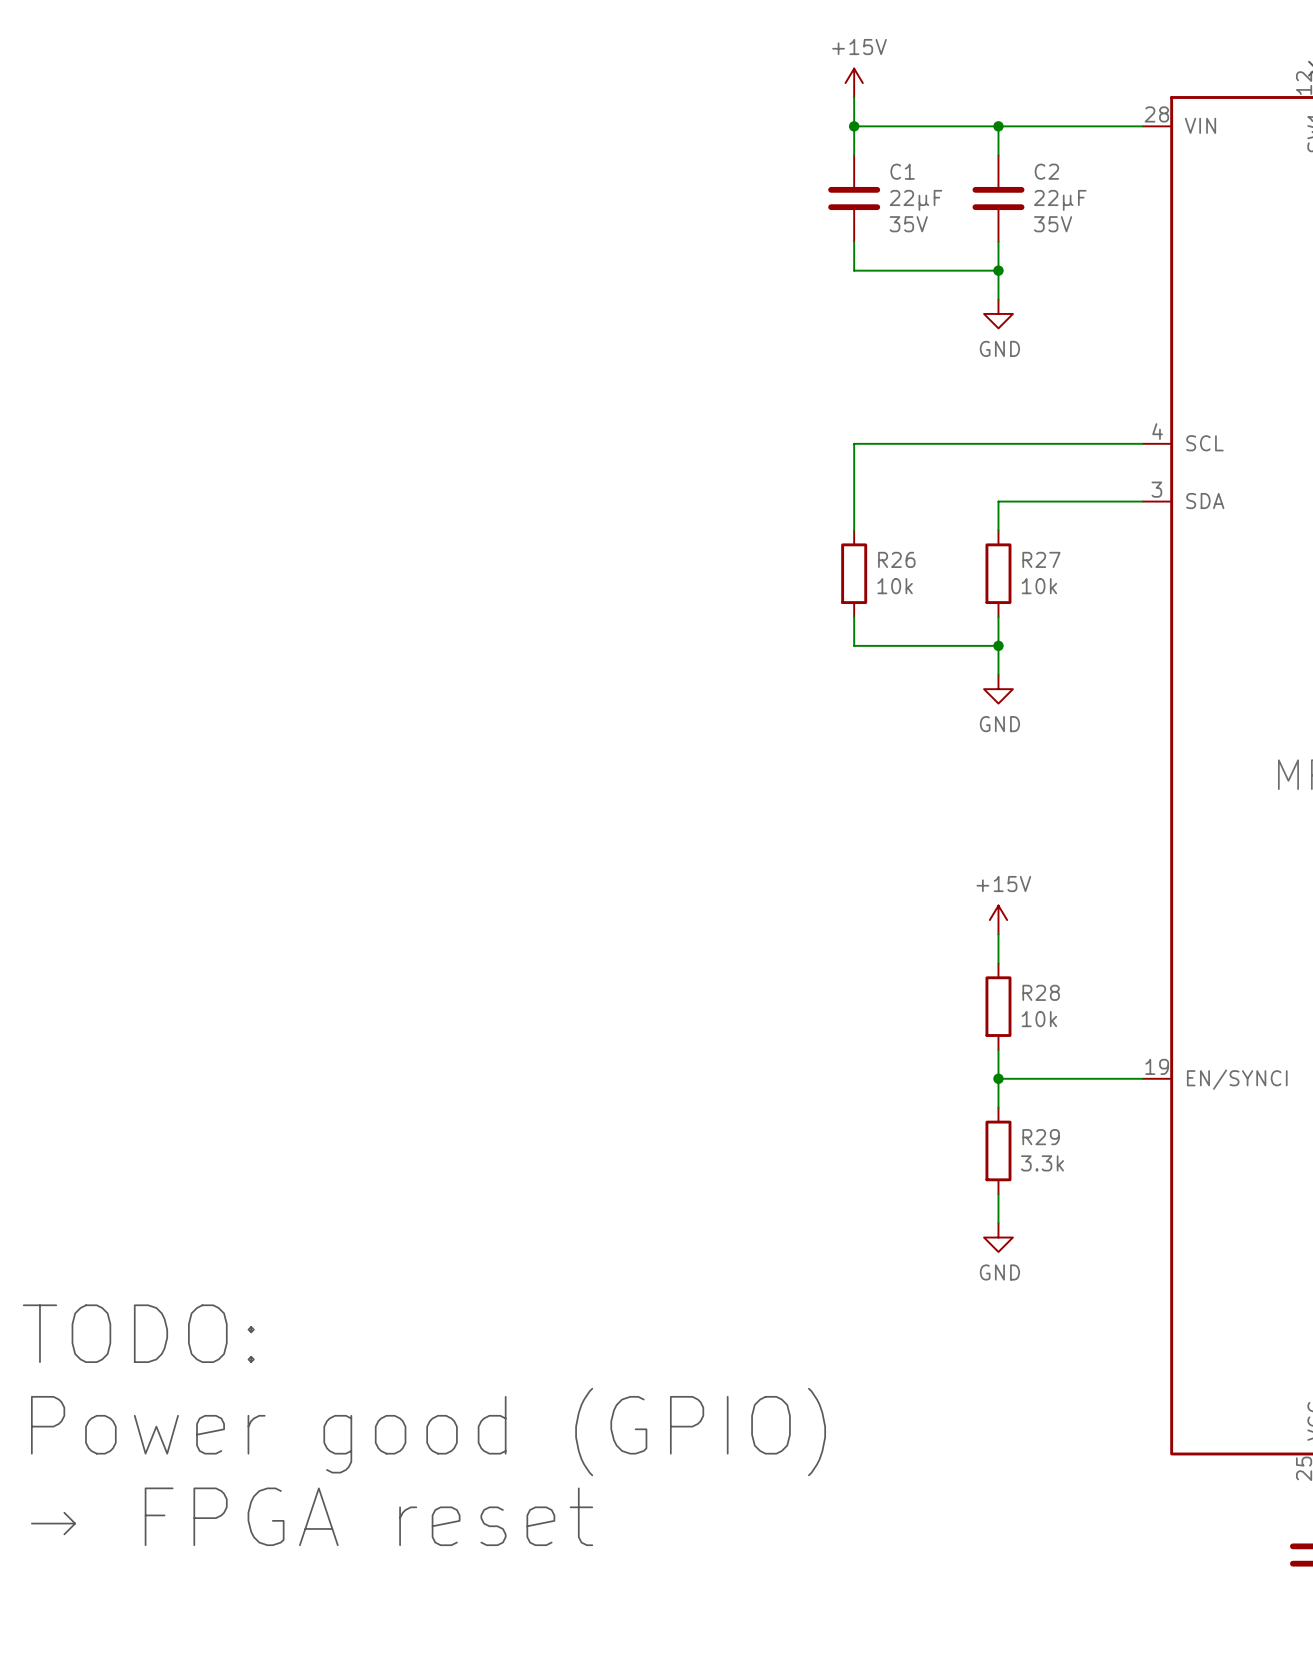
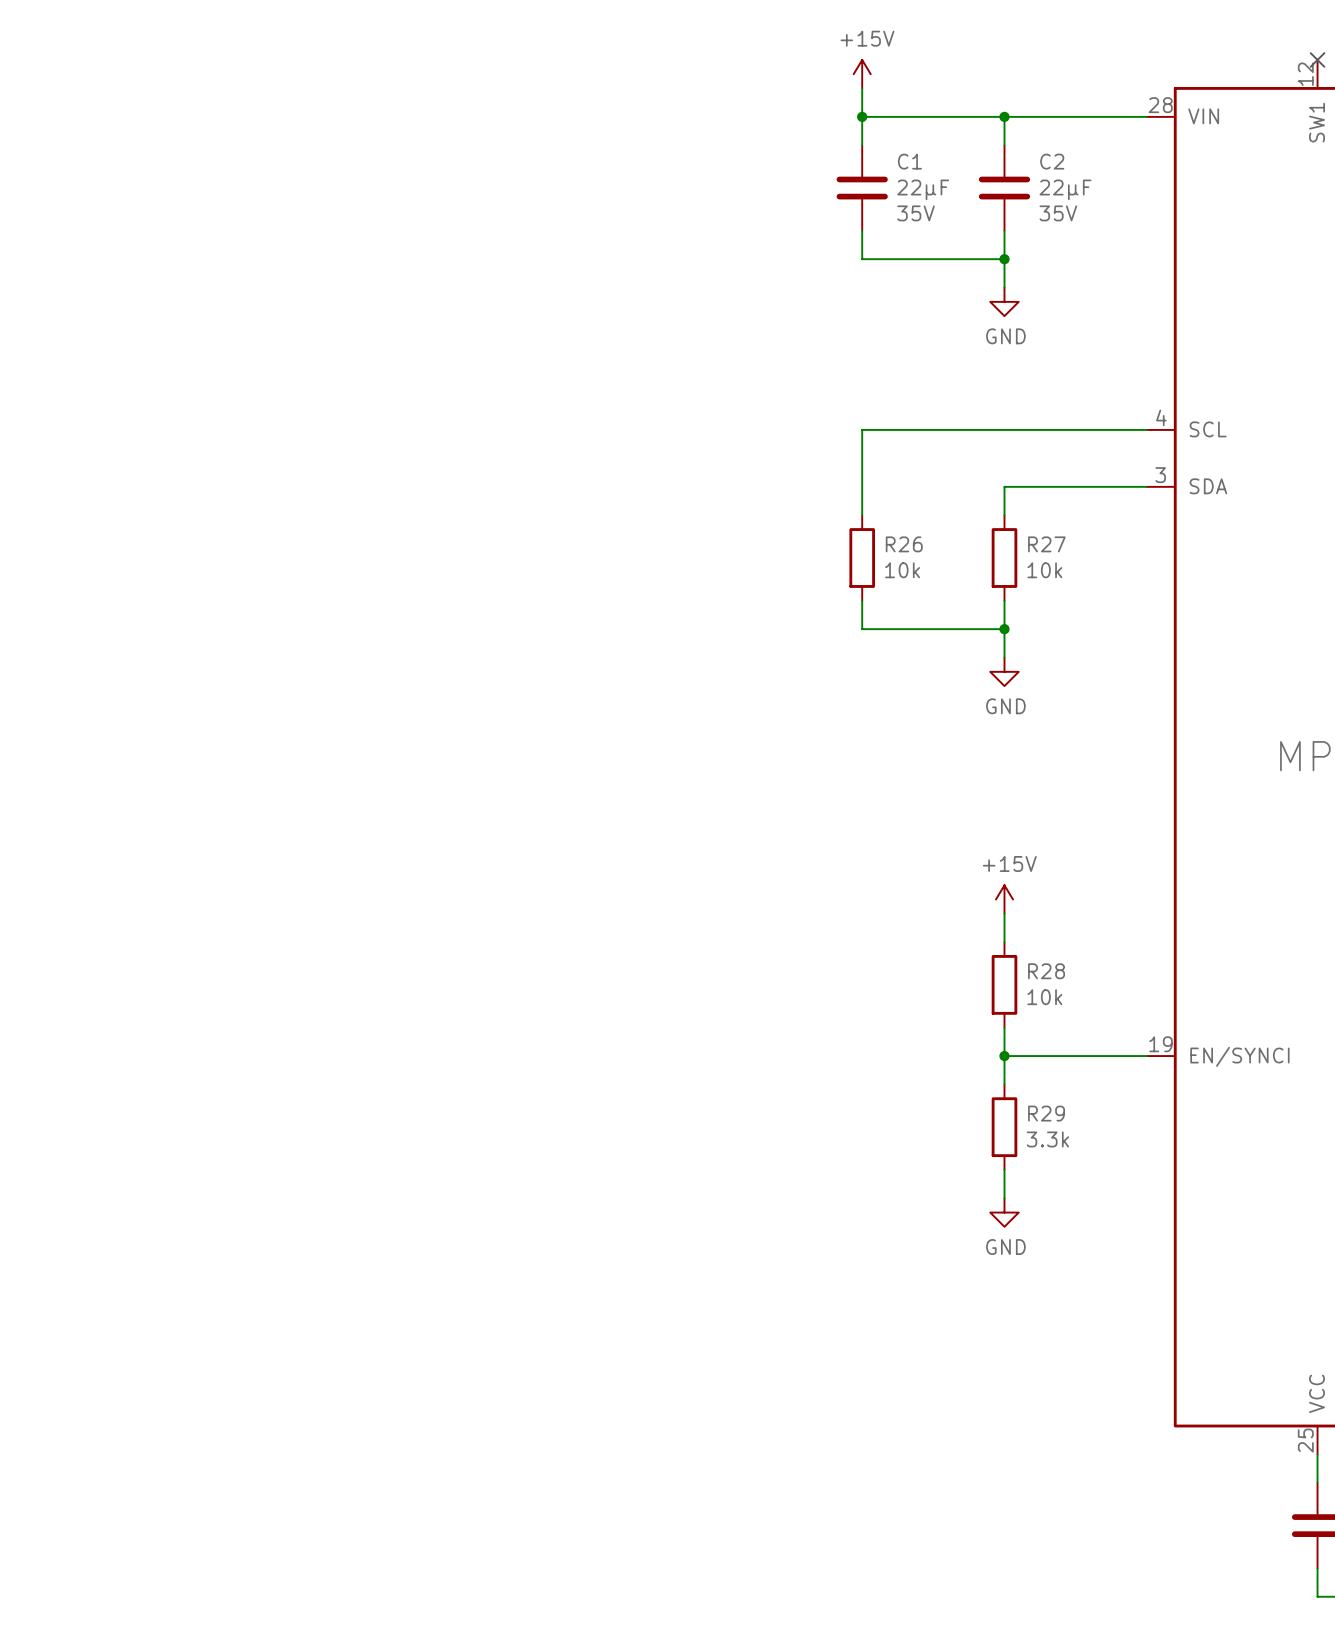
text: TODO: (138, 1333) -> none
text: Power good (GPIO) (428, 1432) -> none
text: → FPGA reset (312, 1516) -> none

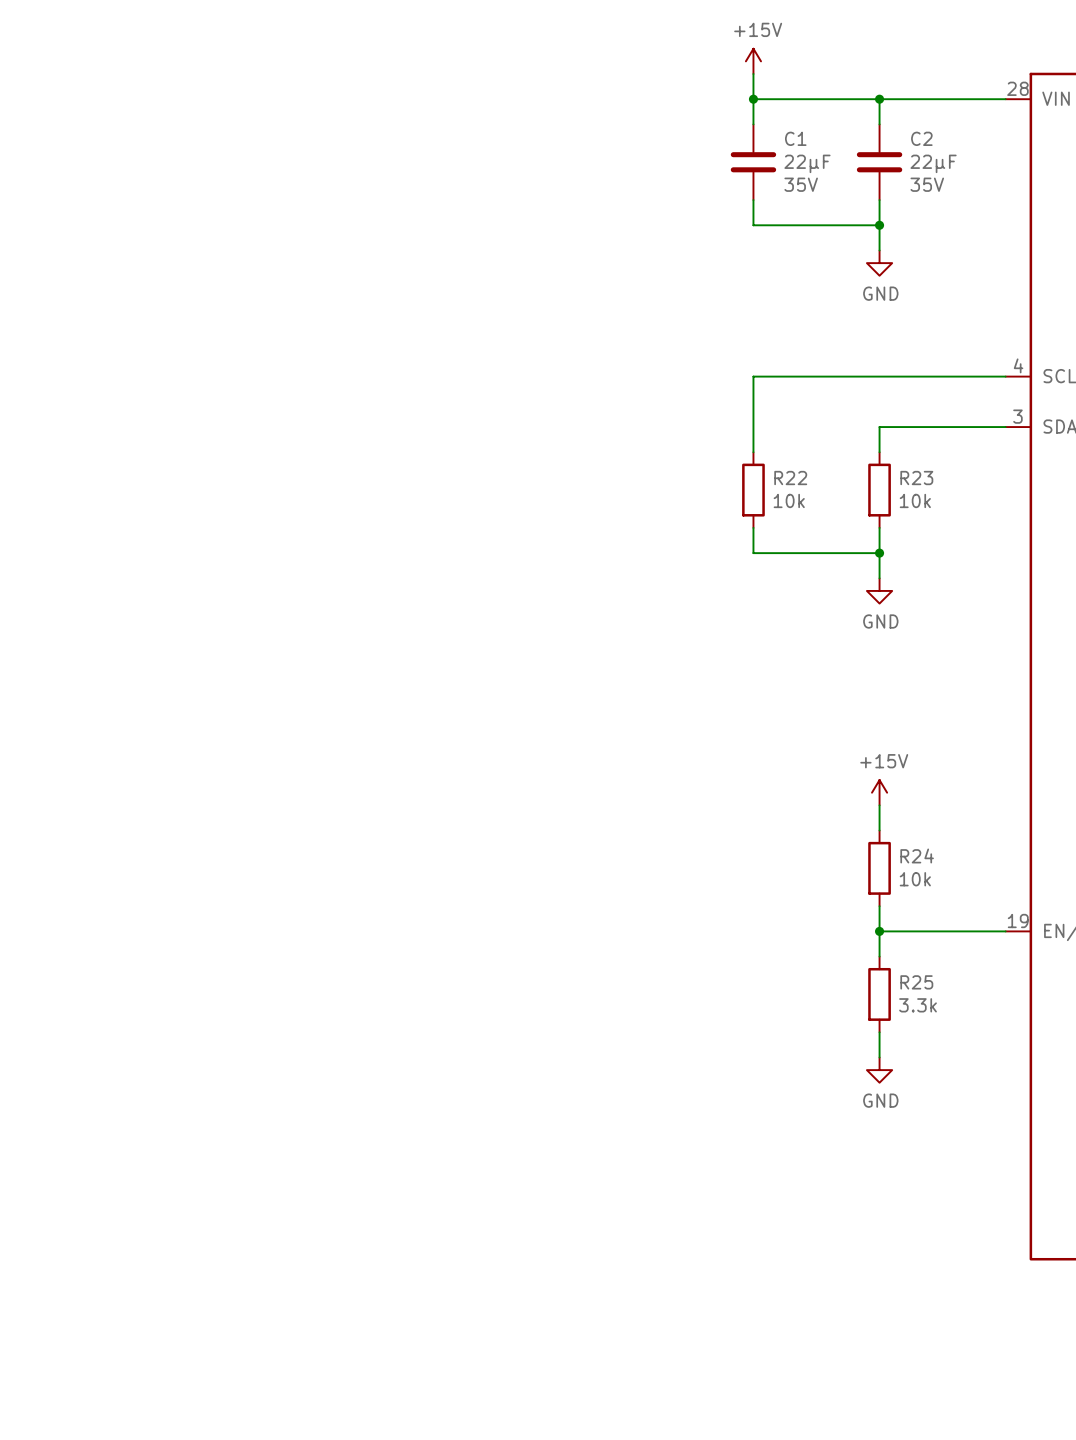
R26 name: R26 (904, 544) -> R22 (790, 478)
R27 name: R27 (1046, 544) -> R23 (916, 478)
R28 name: R28 (1046, 971) -> R24 (917, 855)
R29 name: R29 (1046, 1113) -> R25 (916, 982)

